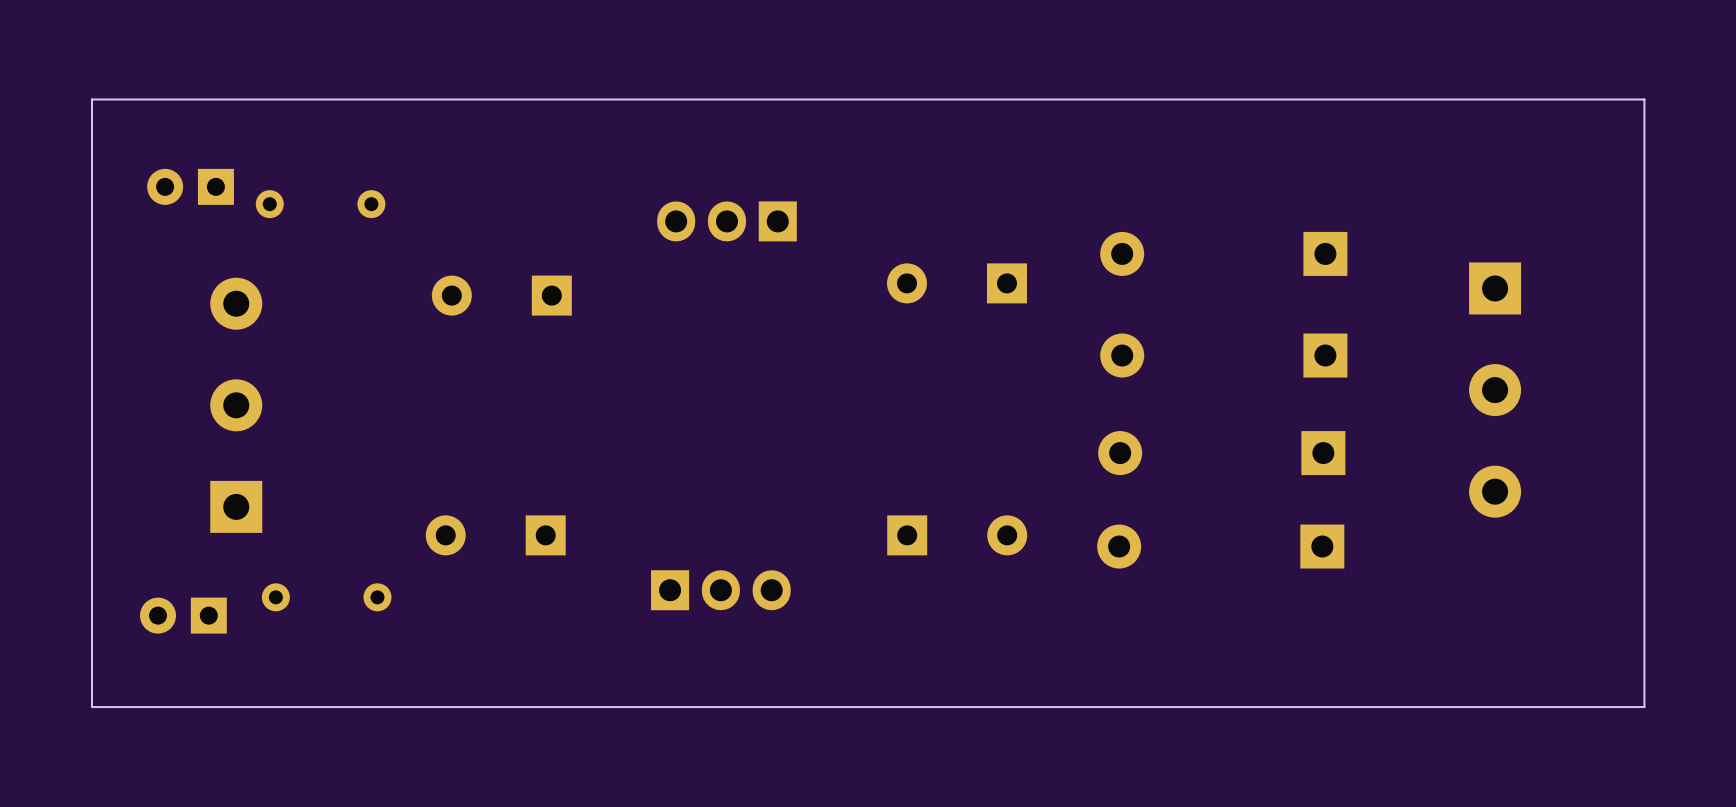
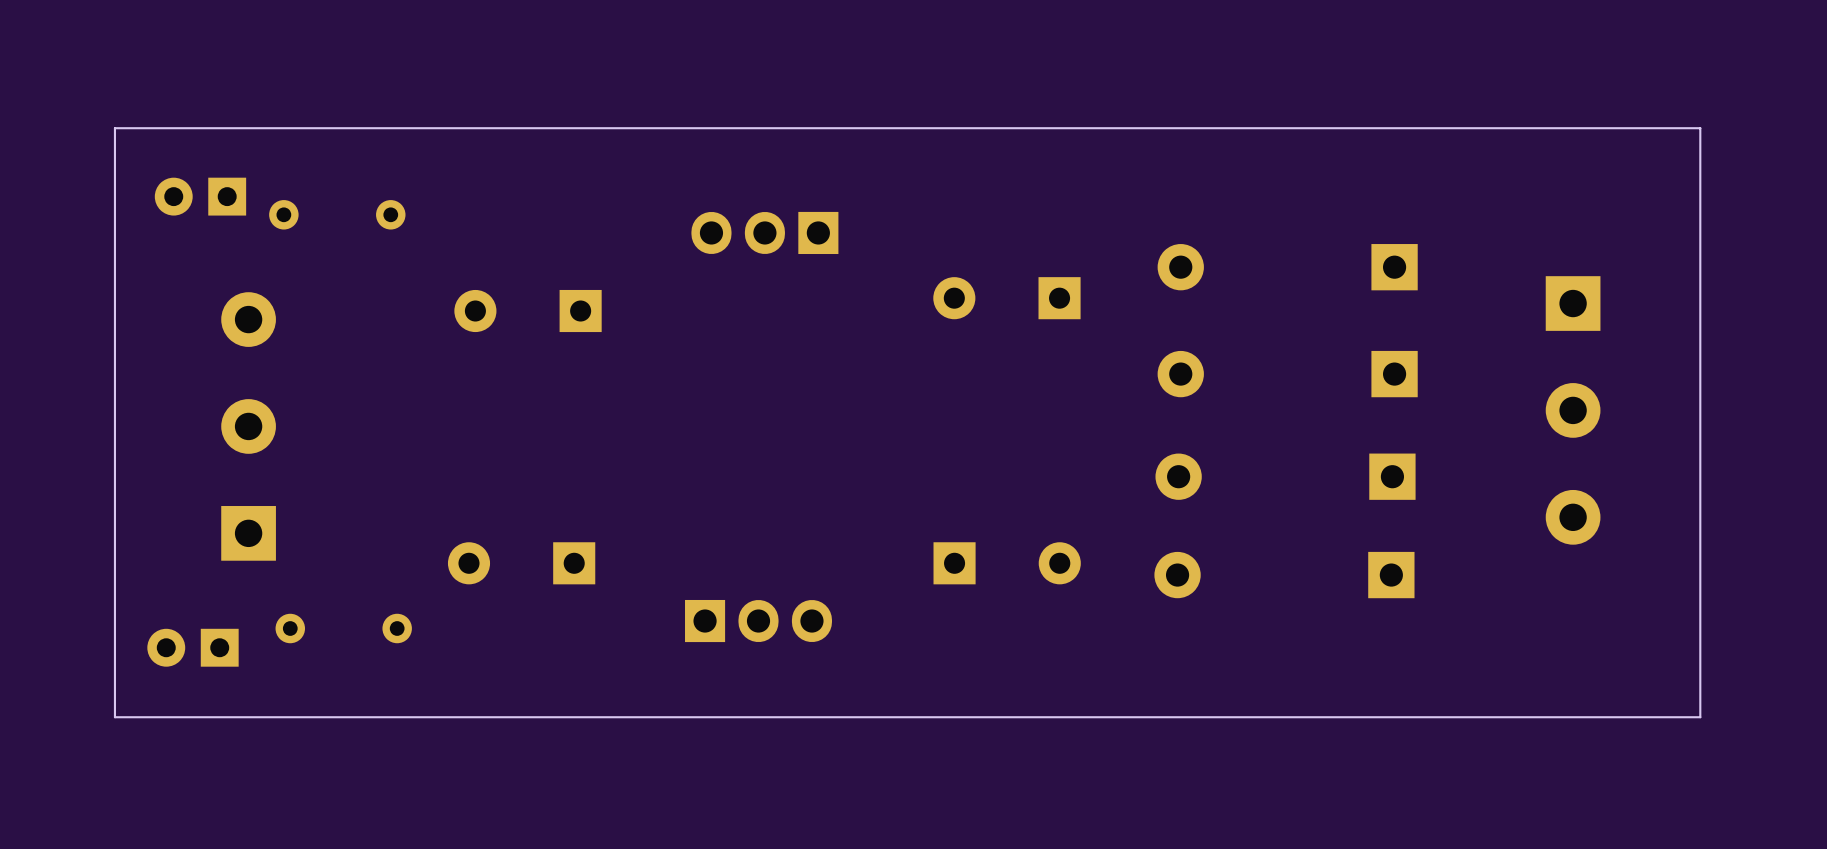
board edge: (1644, 99) (91, 99) (91, 707) (1644, 707) (1644, 99) -> (1700, 128) (1700, 717) (114, 717) (114, 128) (1700, 128)

